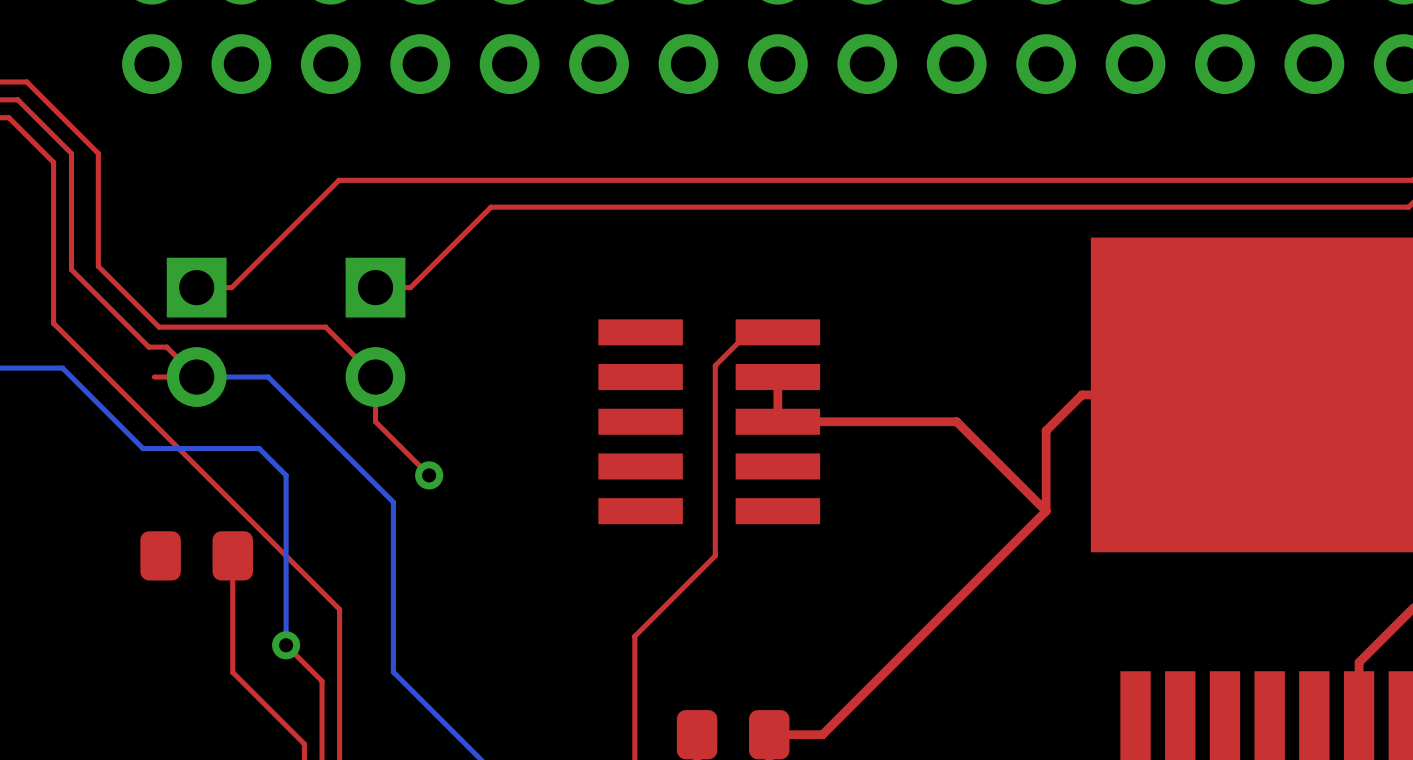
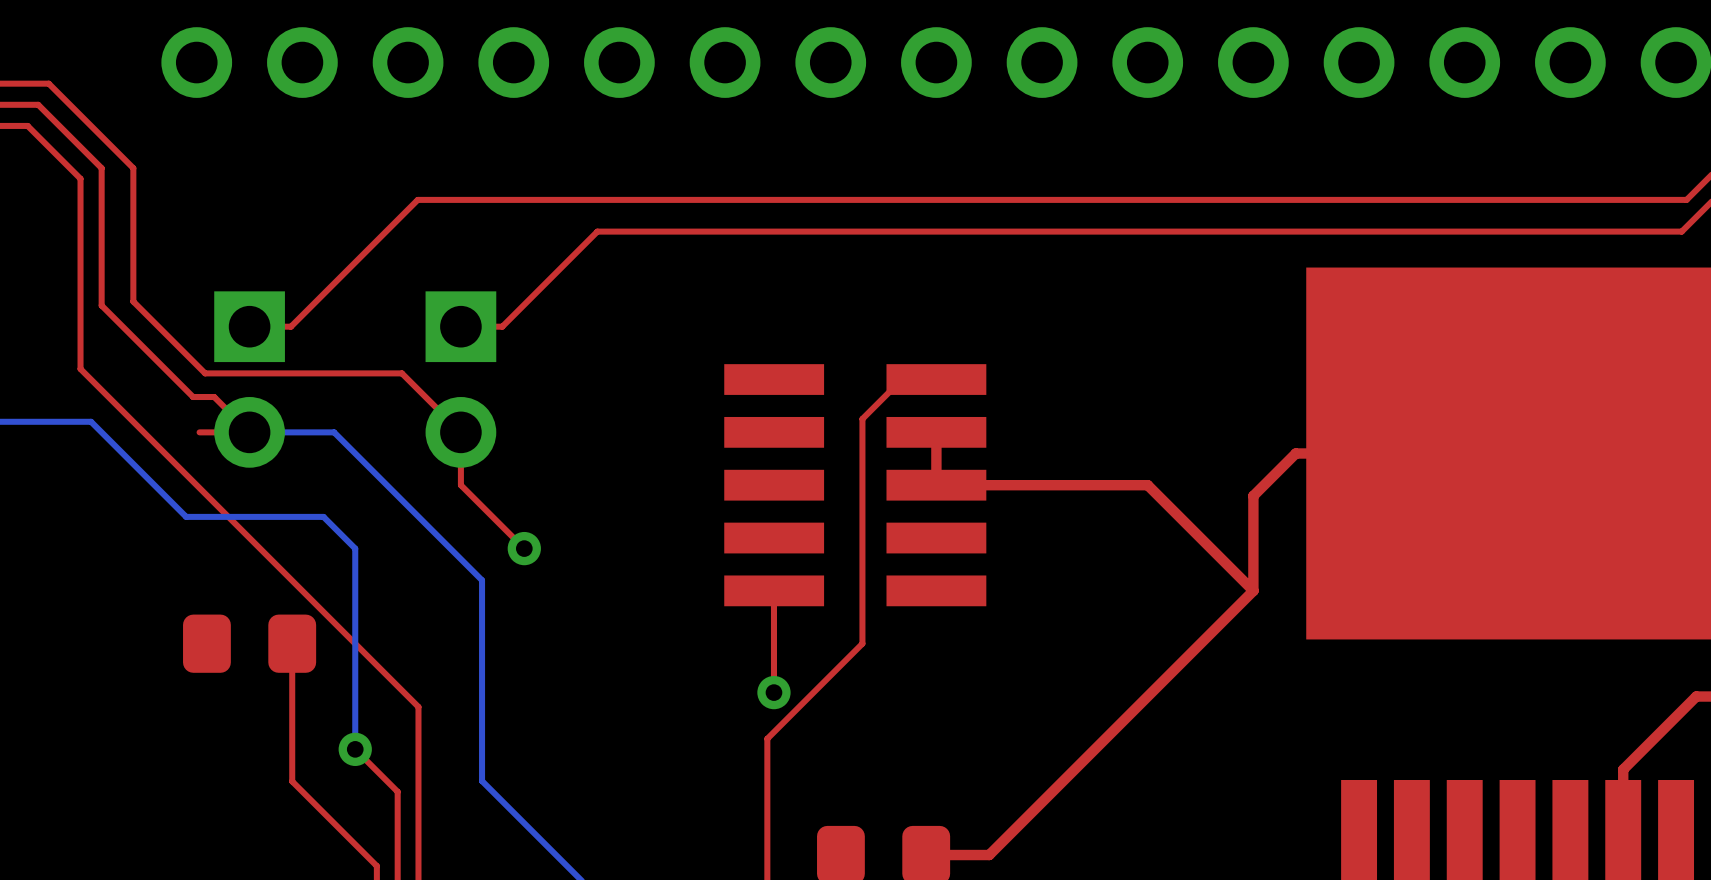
top track: none -> (773, 594) (773, 692)
via: none -> (773, 692)

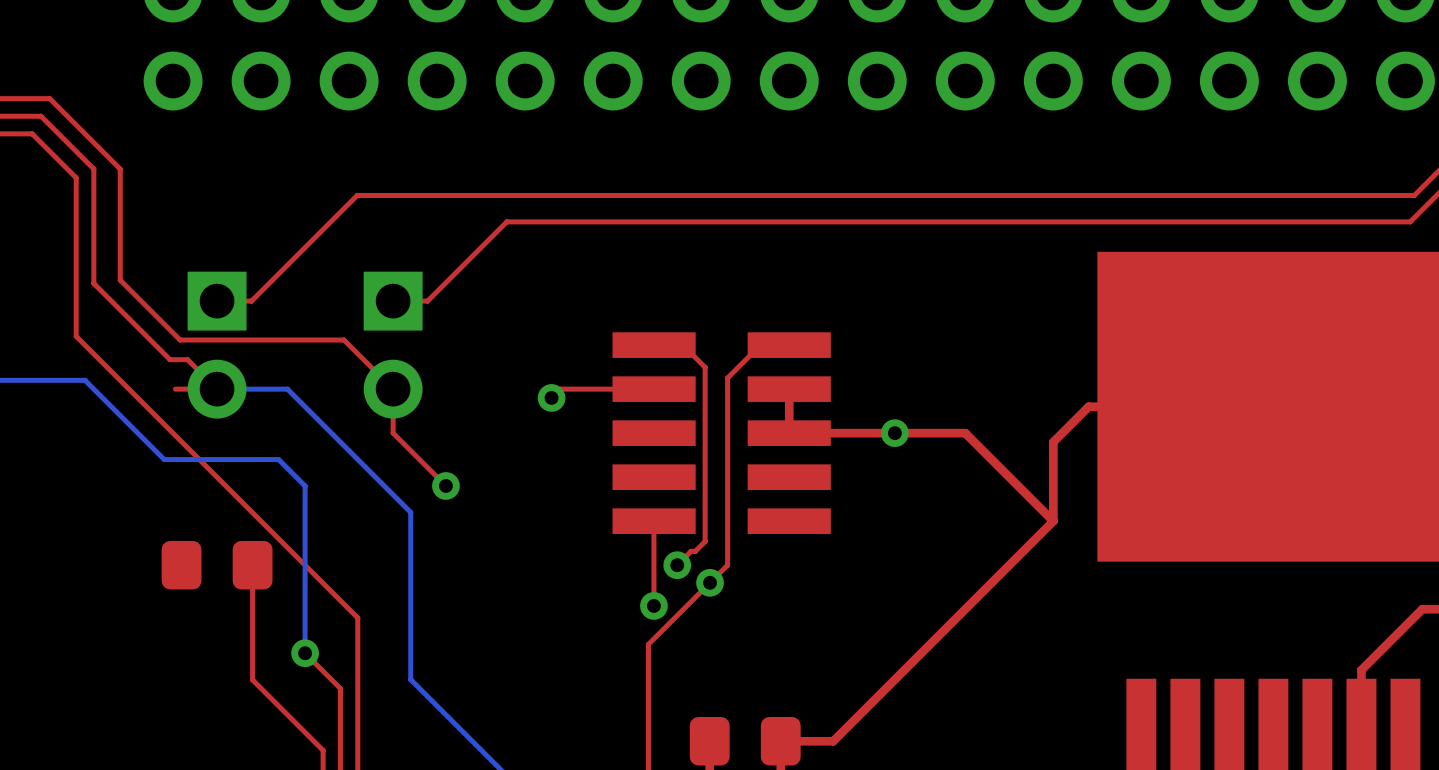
top track: none -> (654, 345) (682, 345) (705, 367) (705, 541) (695, 551) (691, 551) (677, 565)
top track: none -> (654, 389) (560, 389) (551, 397)
via: none -> (551, 397)
via: none -> (894, 433)
via: none -> (677, 565)
via: none -> (710, 582)

